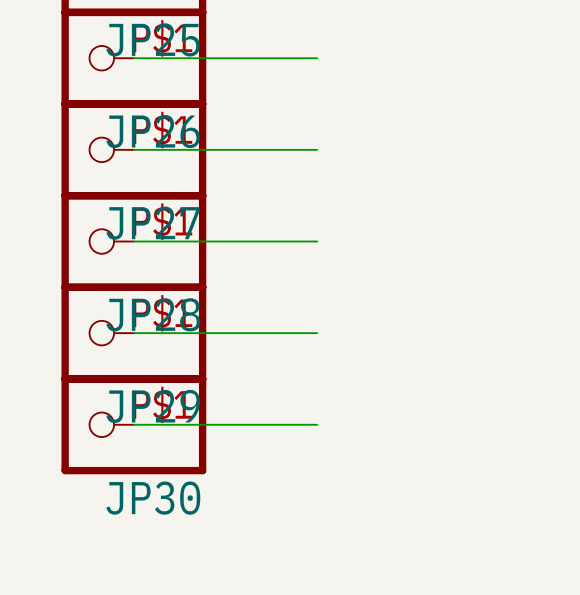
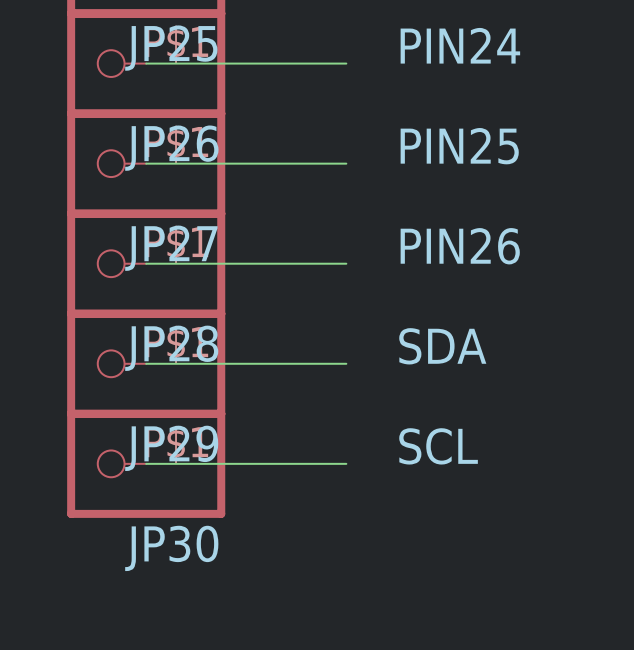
text: none -> PIN24 (460, 45)
text: none -> PIN25 (459, 146)
text: none -> PIN26 (460, 246)
text: none -> SDA (442, 346)
text: none -> SCL (438, 446)

